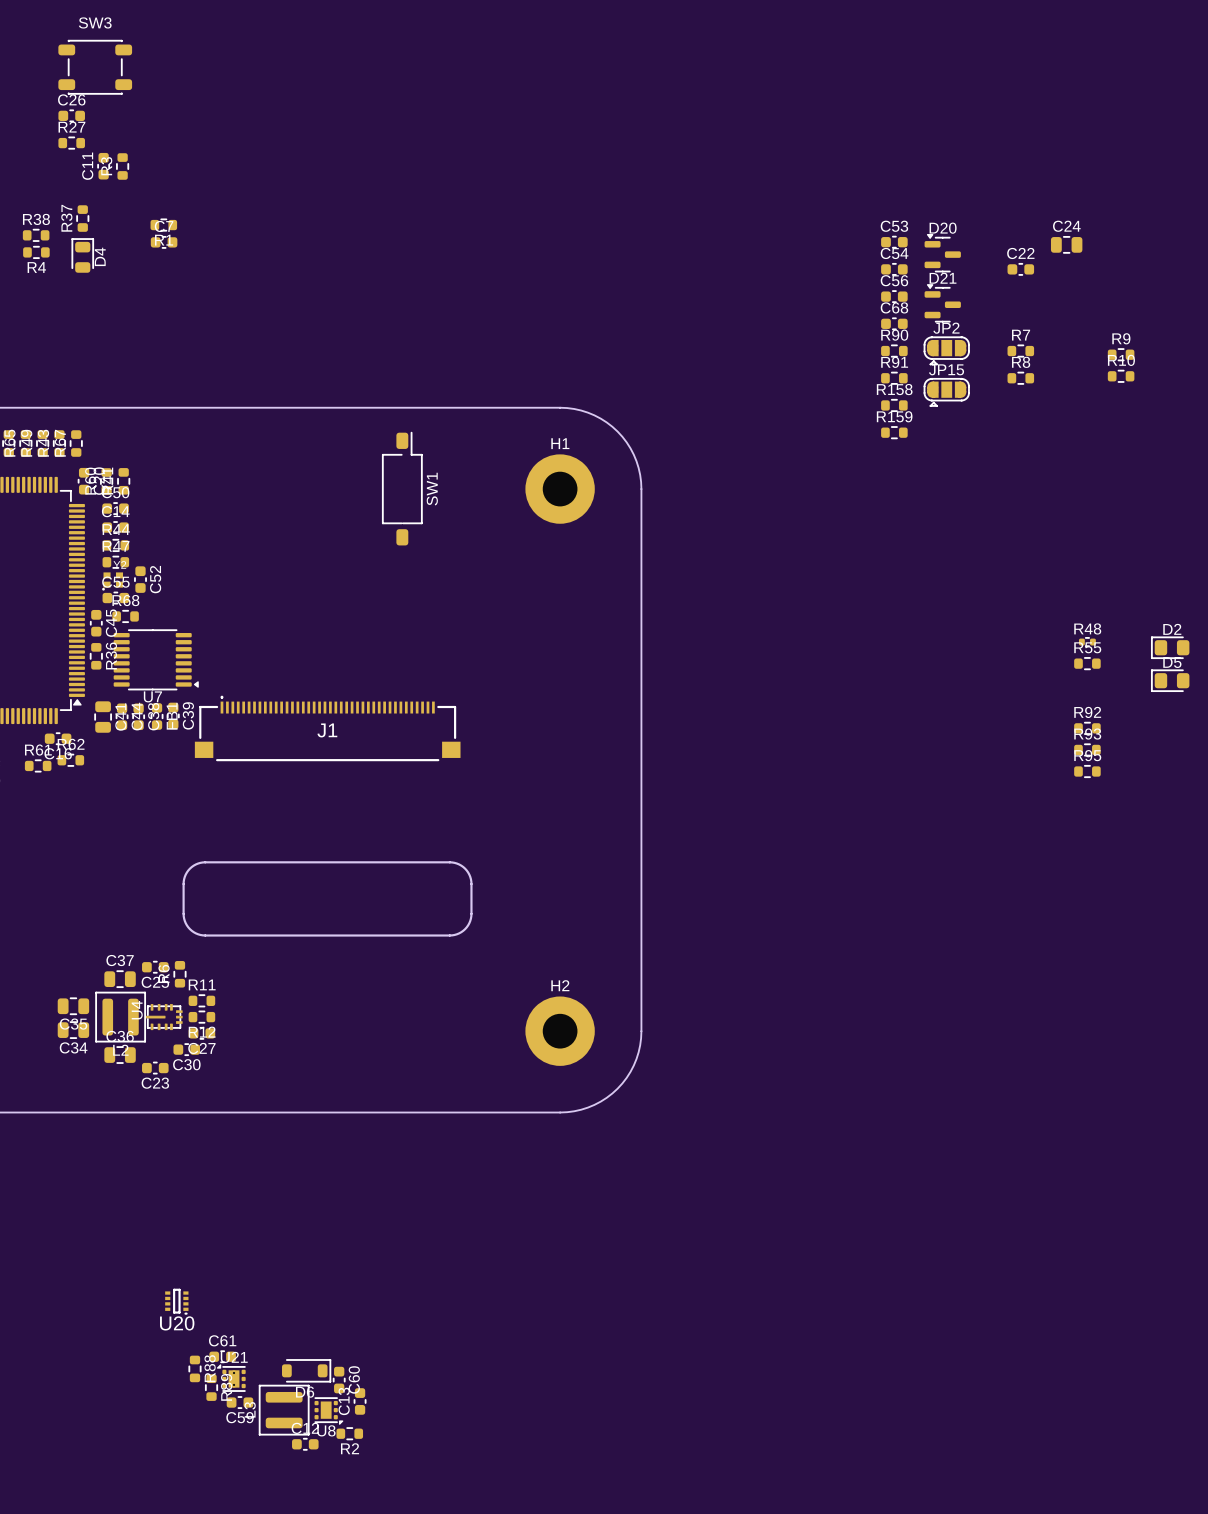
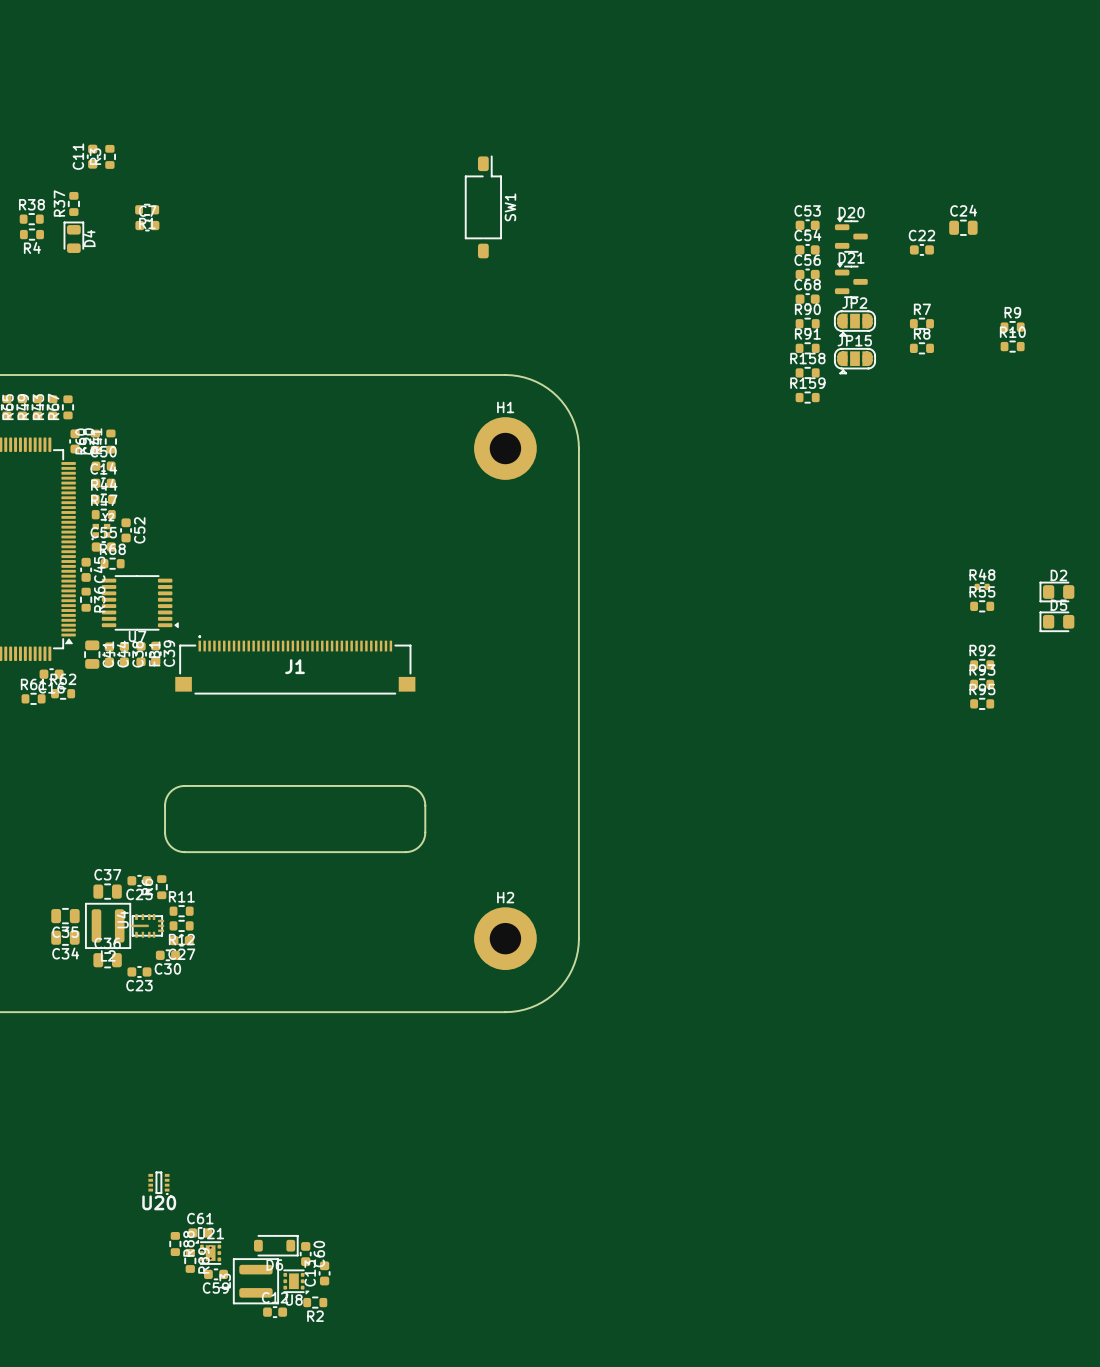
SW3: (95, 67) -> none
C26: (71, 115) -> none
R27: (71, 143) -> none
SW1 position: (402, 488) -> (483, 207)

